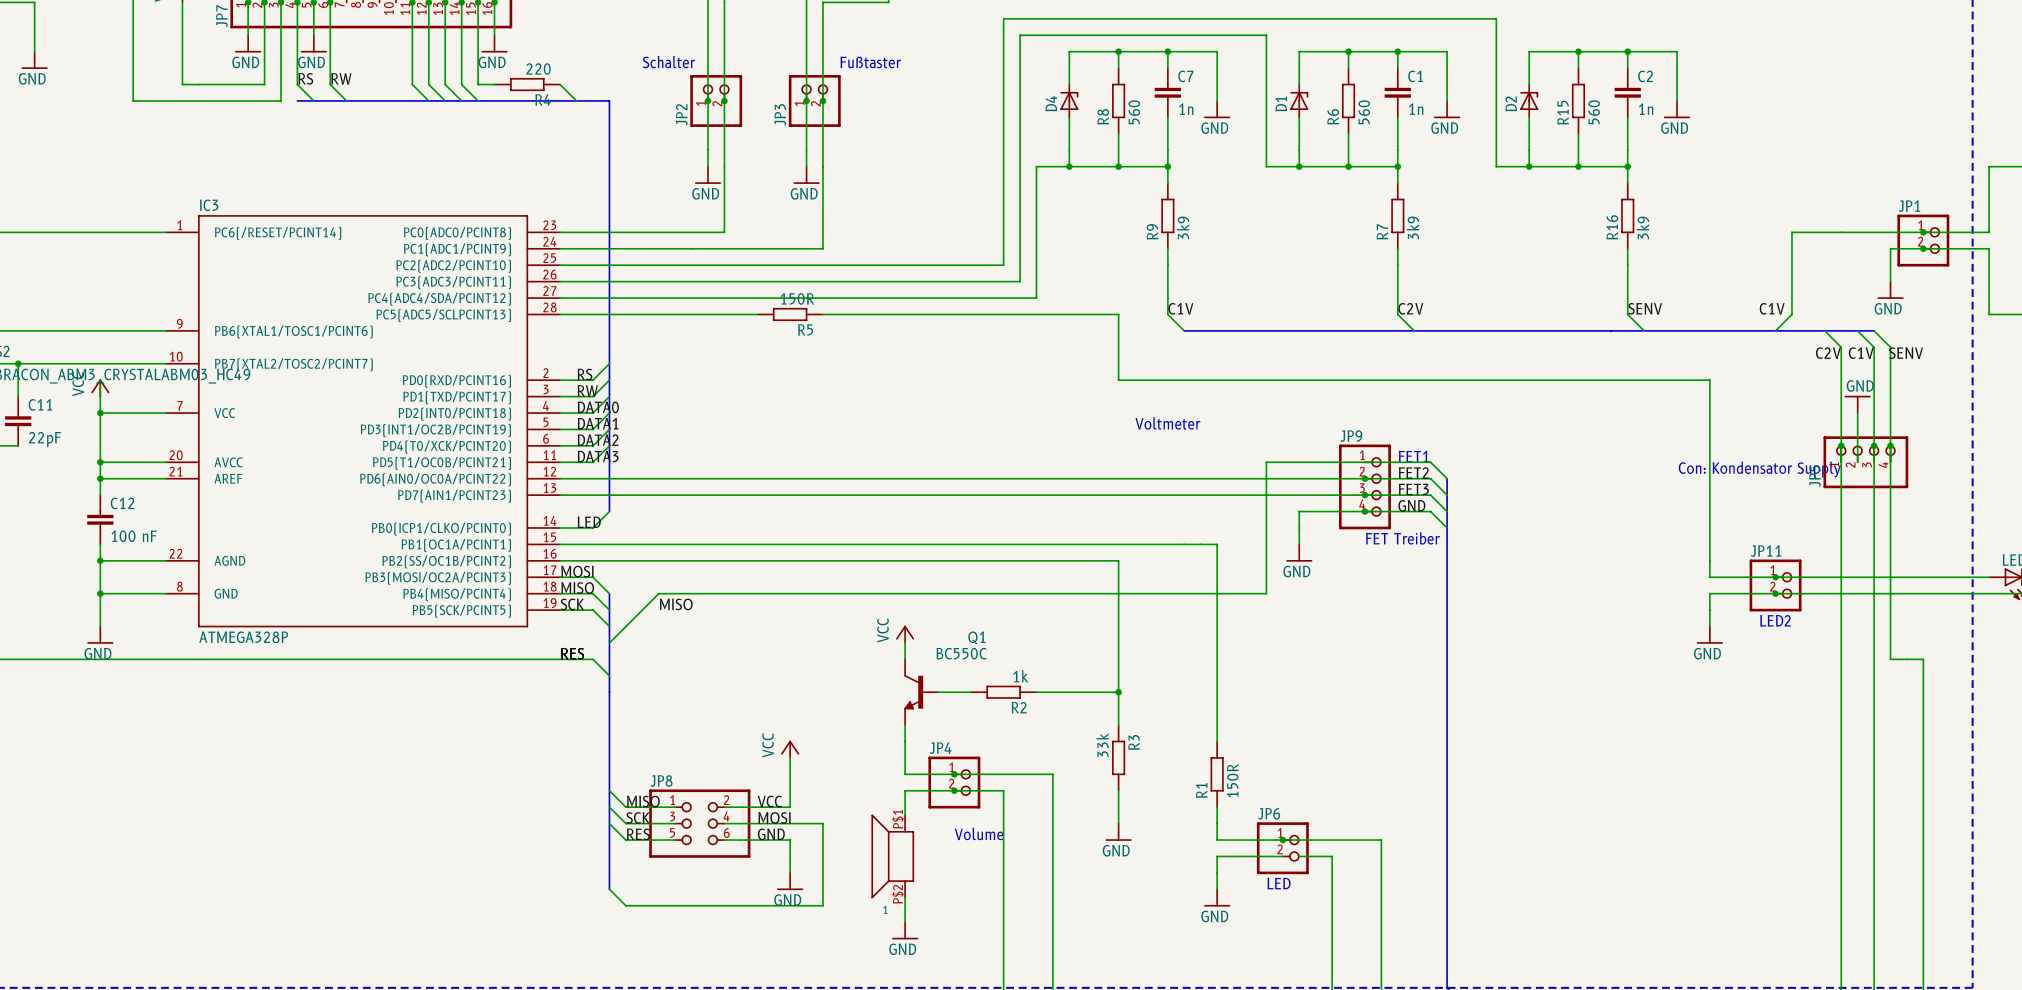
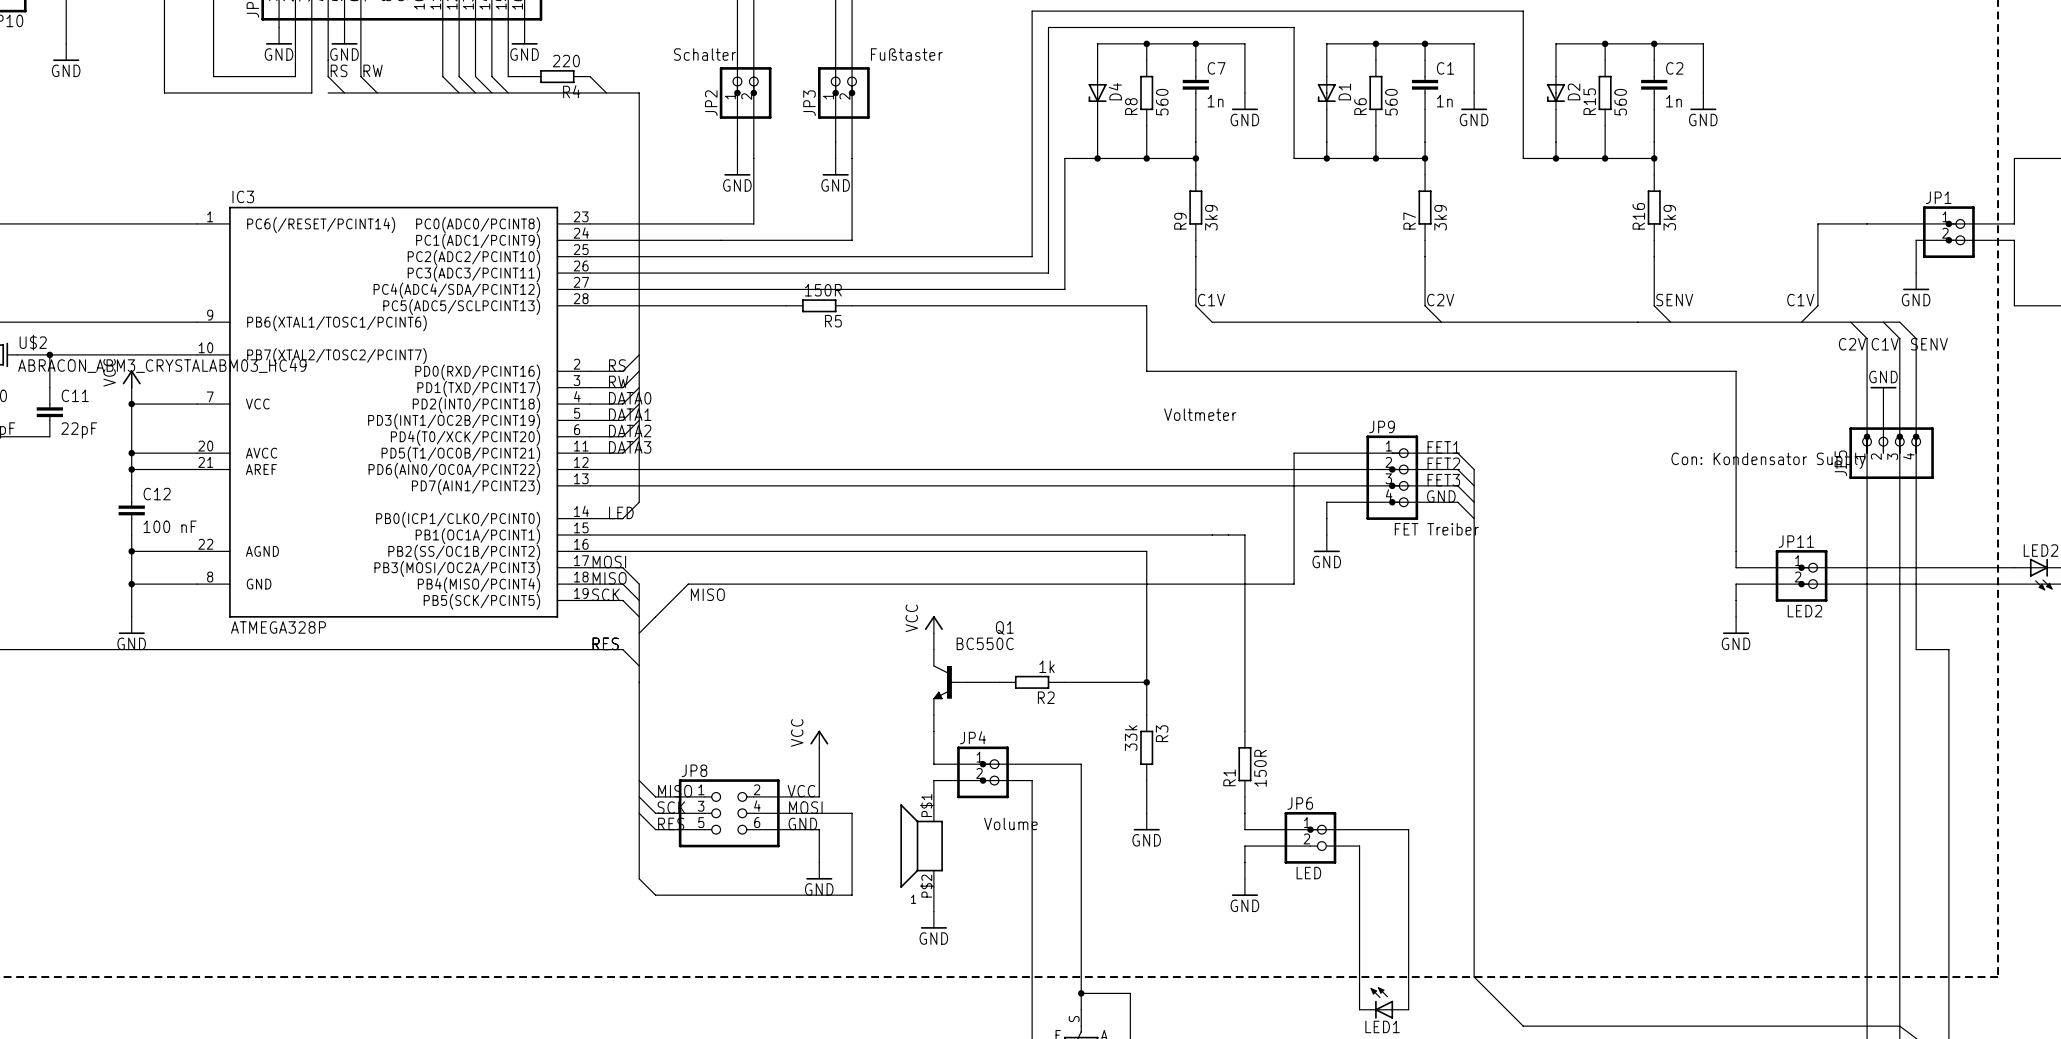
D4 rotation: 0° (1069, 100) -> 180° (1097, 92)
D1 rotation: 0° (1299, 100) -> 180° (1326, 92)
D2 rotation: 0° (1529, 100) -> 180° (1556, 92)

